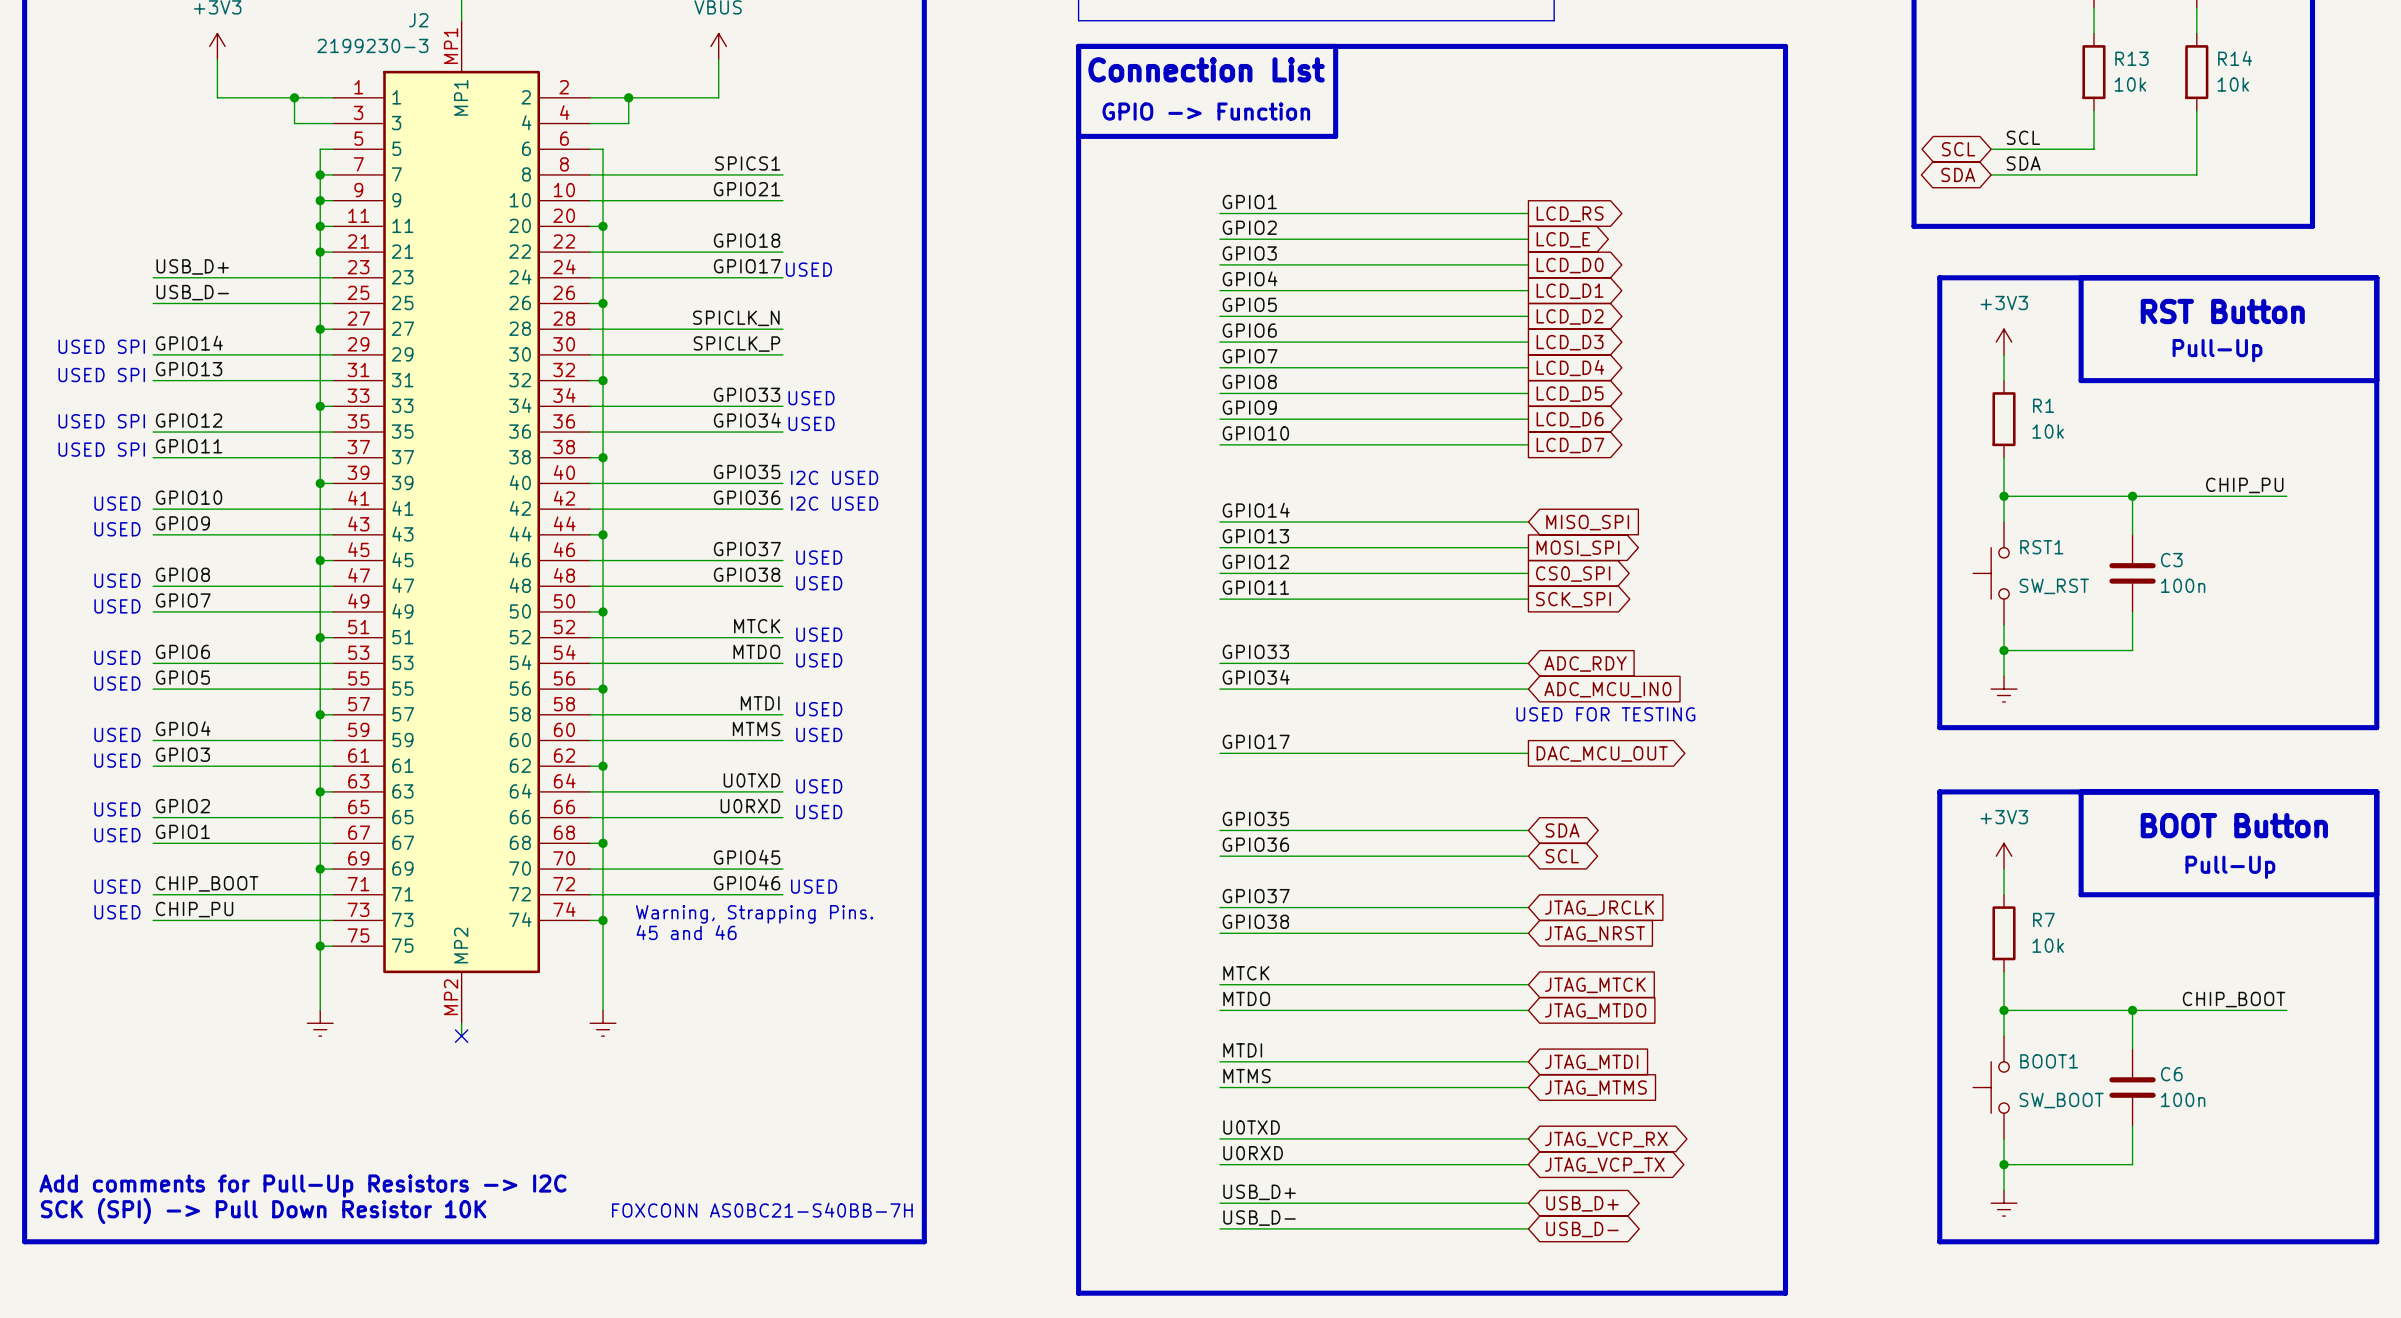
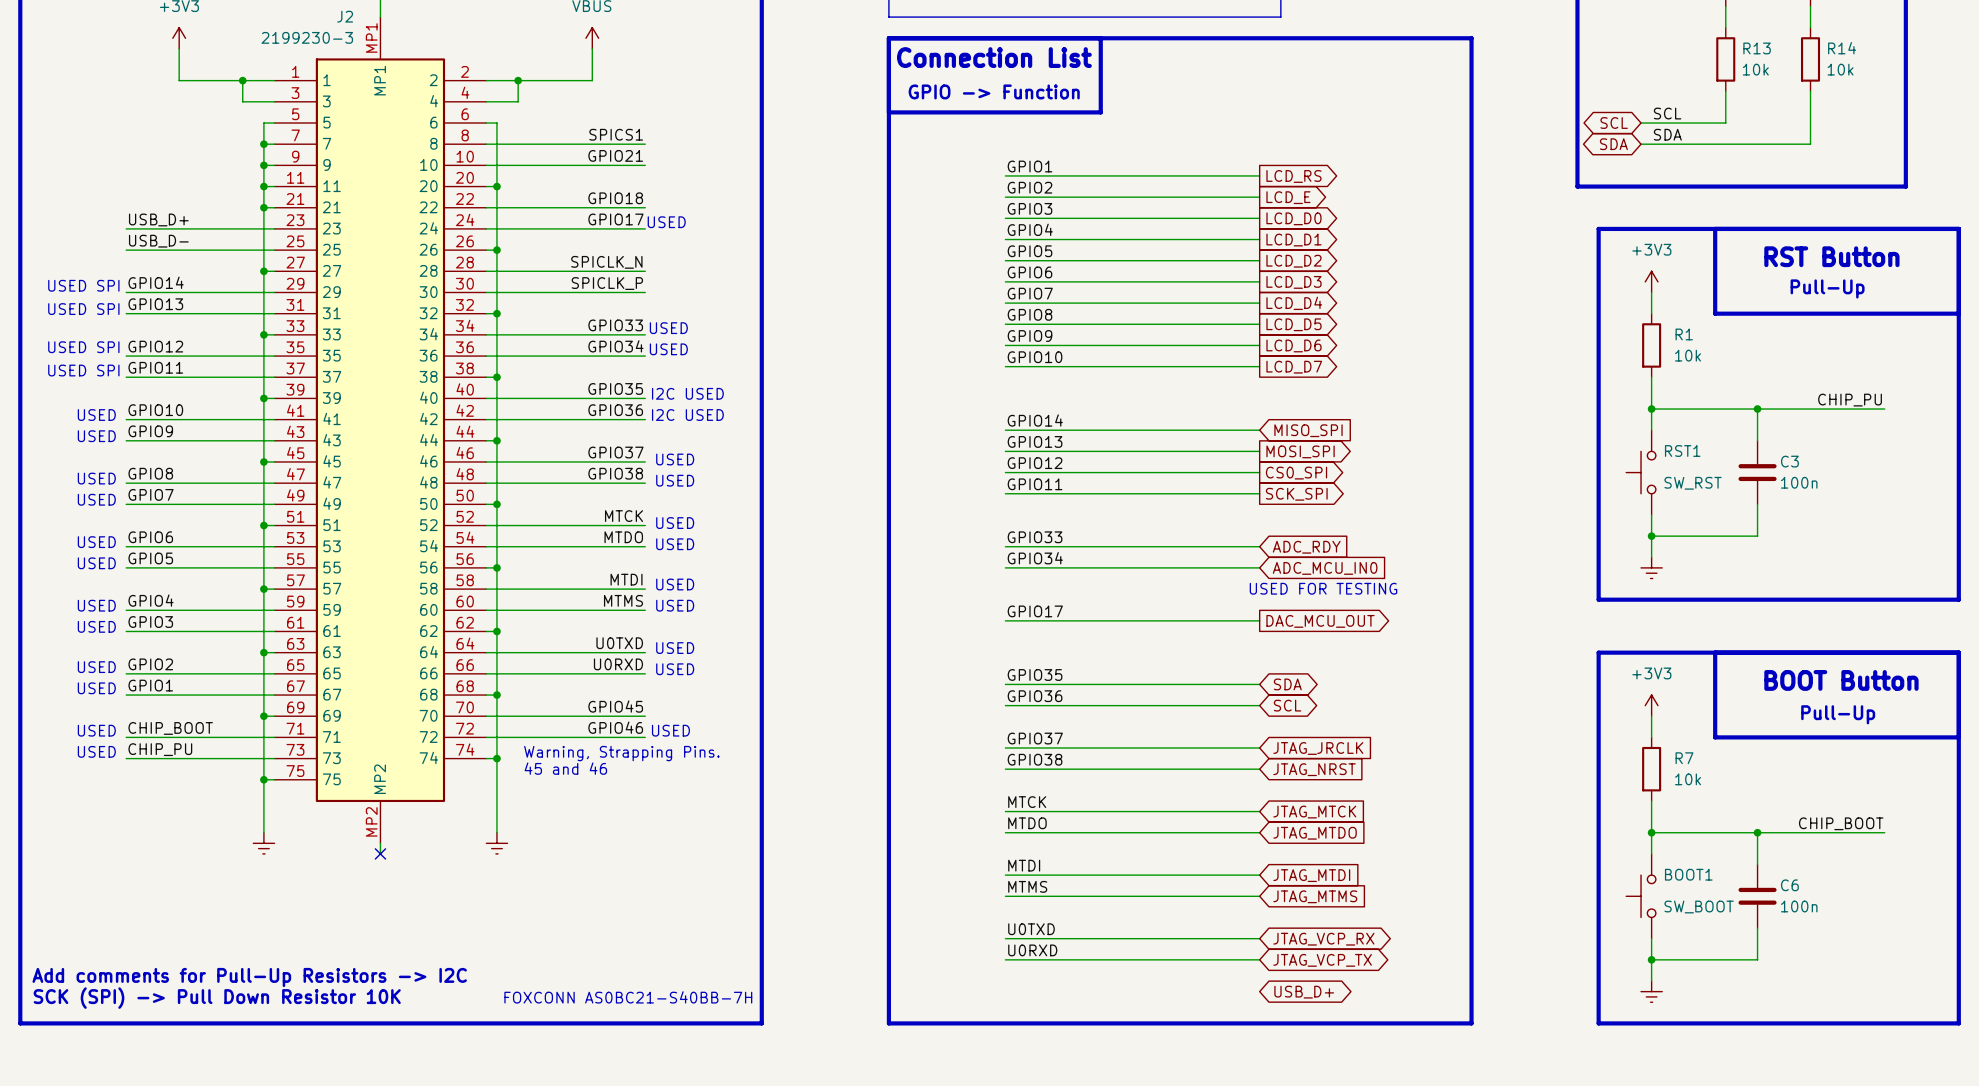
label: USB_D+ (1259, 1192) -> none
wire: (1219, 1203) (1528, 1203) -> none
label: USB_D- (1259, 1218) -> none
wire: (1219, 1228) (1528, 1228) -> none
global label: USB_D- (1582, 1229) -> none
line: (1078, 1241) (1078, 1293) (1785, 1293) (1785, 1241) -> (888, 1023) (1471, 1023)

